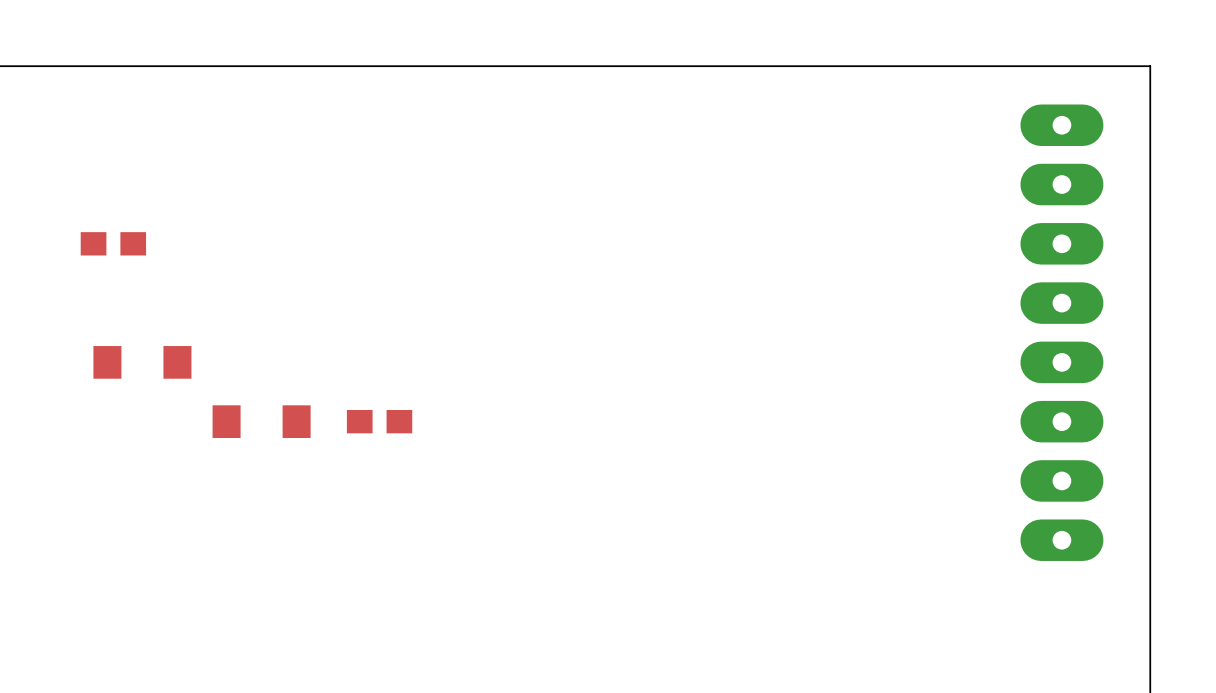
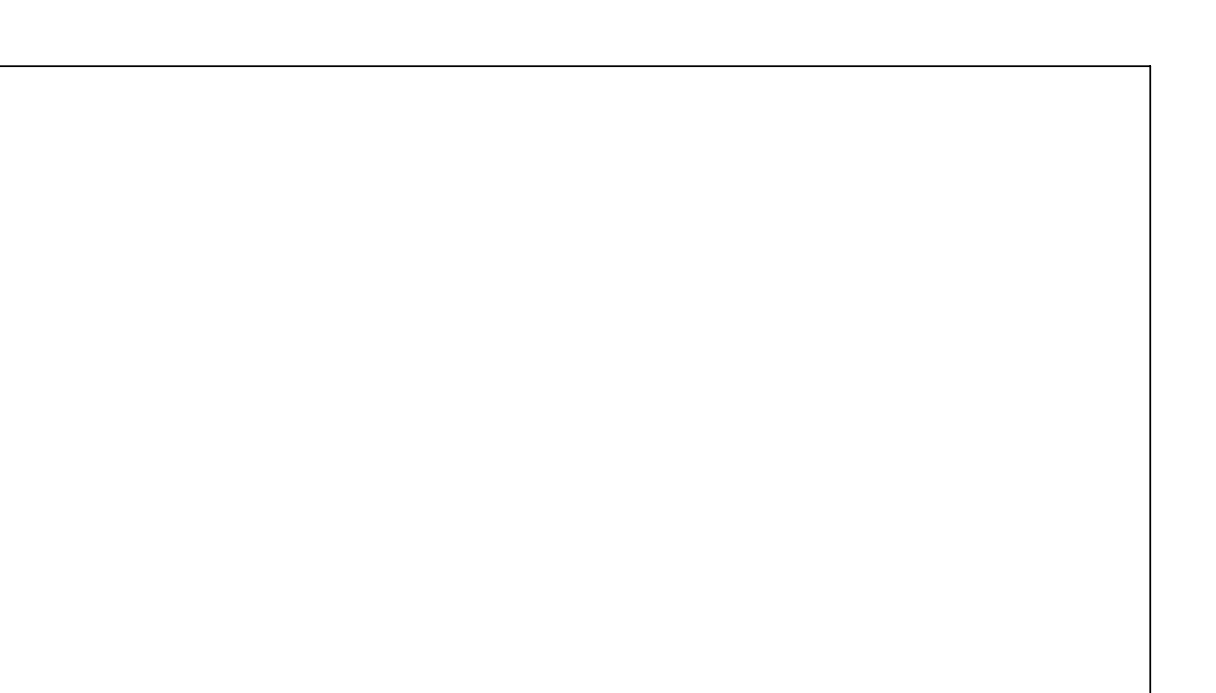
part: (113, 243) -> none
part: (1061, 332) -> none
part: (142, 362) -> none
part: (261, 421) -> none
part: (379, 421) -> none

